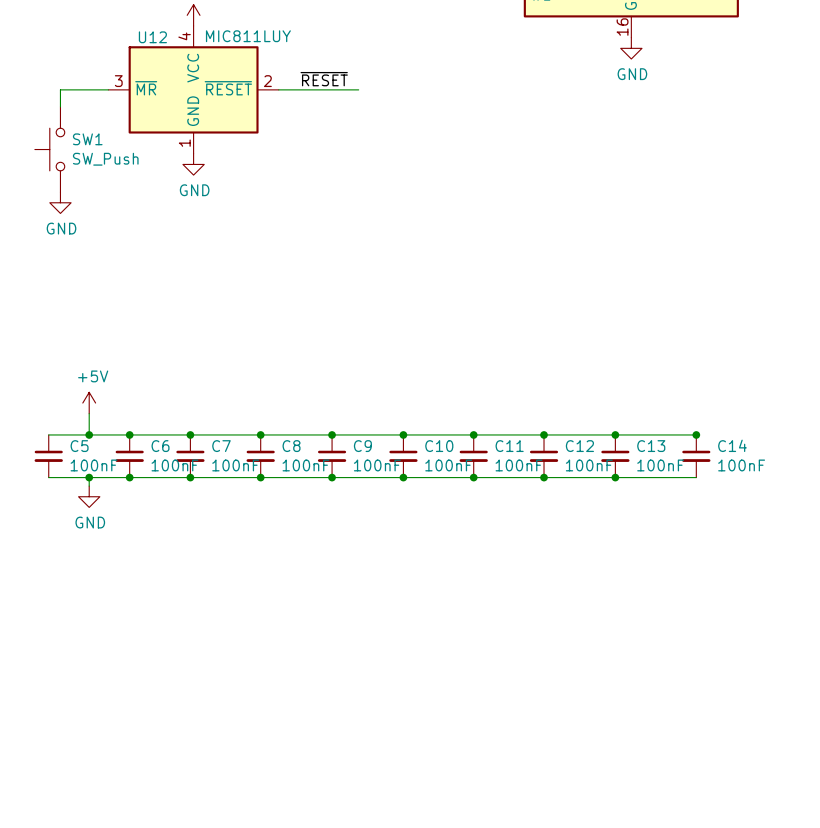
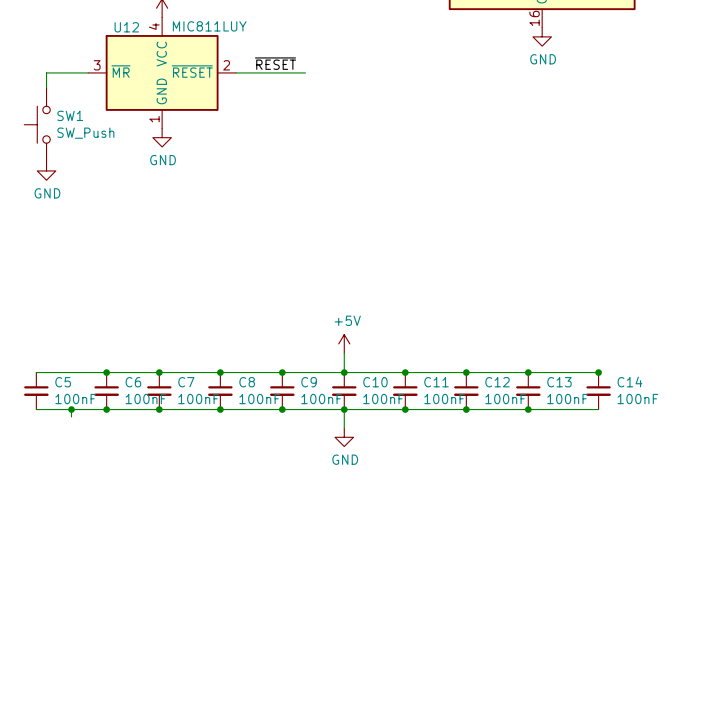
power symbol: none -> +5V (344, 343)
power symbol: +5V (89, 403) -> none
wire: none -> (344, 353) (344, 371)
wire: (89, 413) (89, 434) -> none
junction: (89, 434) -> none
wire: none -> (344, 409) (344, 428)
power symbol: GND (89, 496) -> none
power symbol: none -> GND (344, 437)

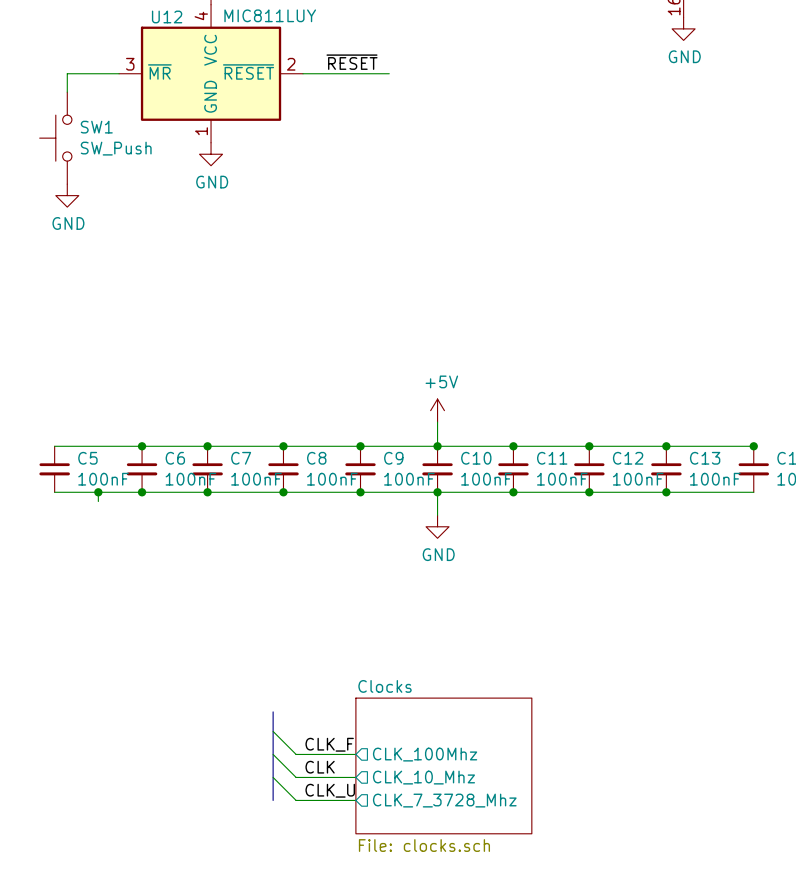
bus: none -> (273, 711) (273, 800)
wire: none -> (273, 731) (296, 754) (355, 754)
label: none -> CLK_F (329, 744)
wire: none -> (273, 754) (296, 777) (355, 777)
sheet pin: none -> CLK_100Mhz (425, 754)
sheet Clocks: none -> File: clocks.sch (443, 765)
label: none -> CLK (320, 767)
wire: none -> (273, 777) (296, 800) (355, 800)
sheet pin: none -> CLK_10_Mhz (423, 777)
label: none -> CLK_U (330, 790)
sheet pin: none -> CLK_7_3728_Mhz (444, 800)

